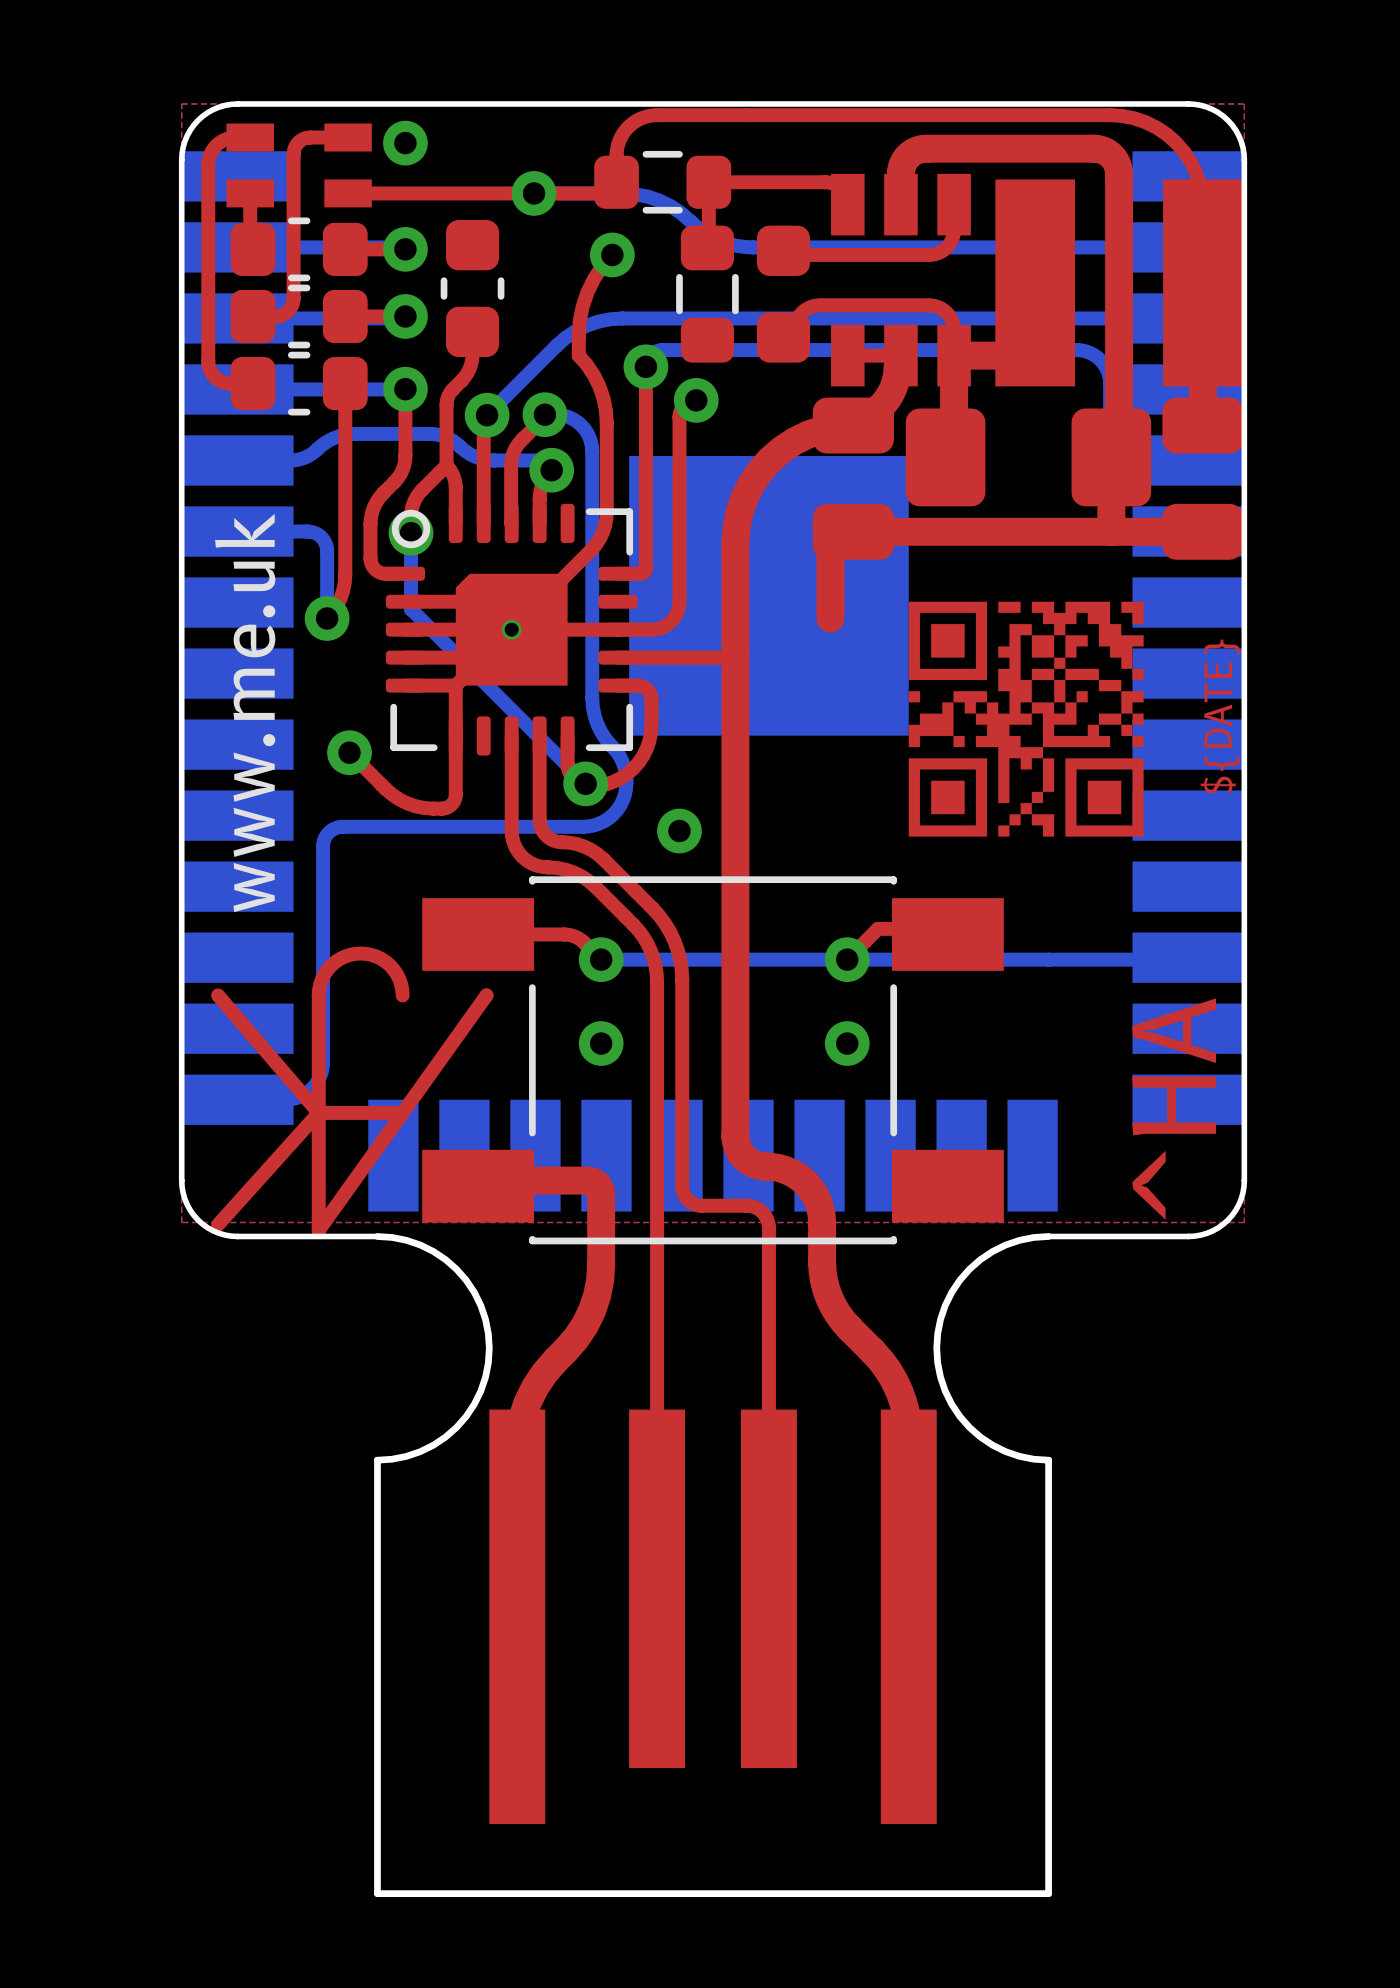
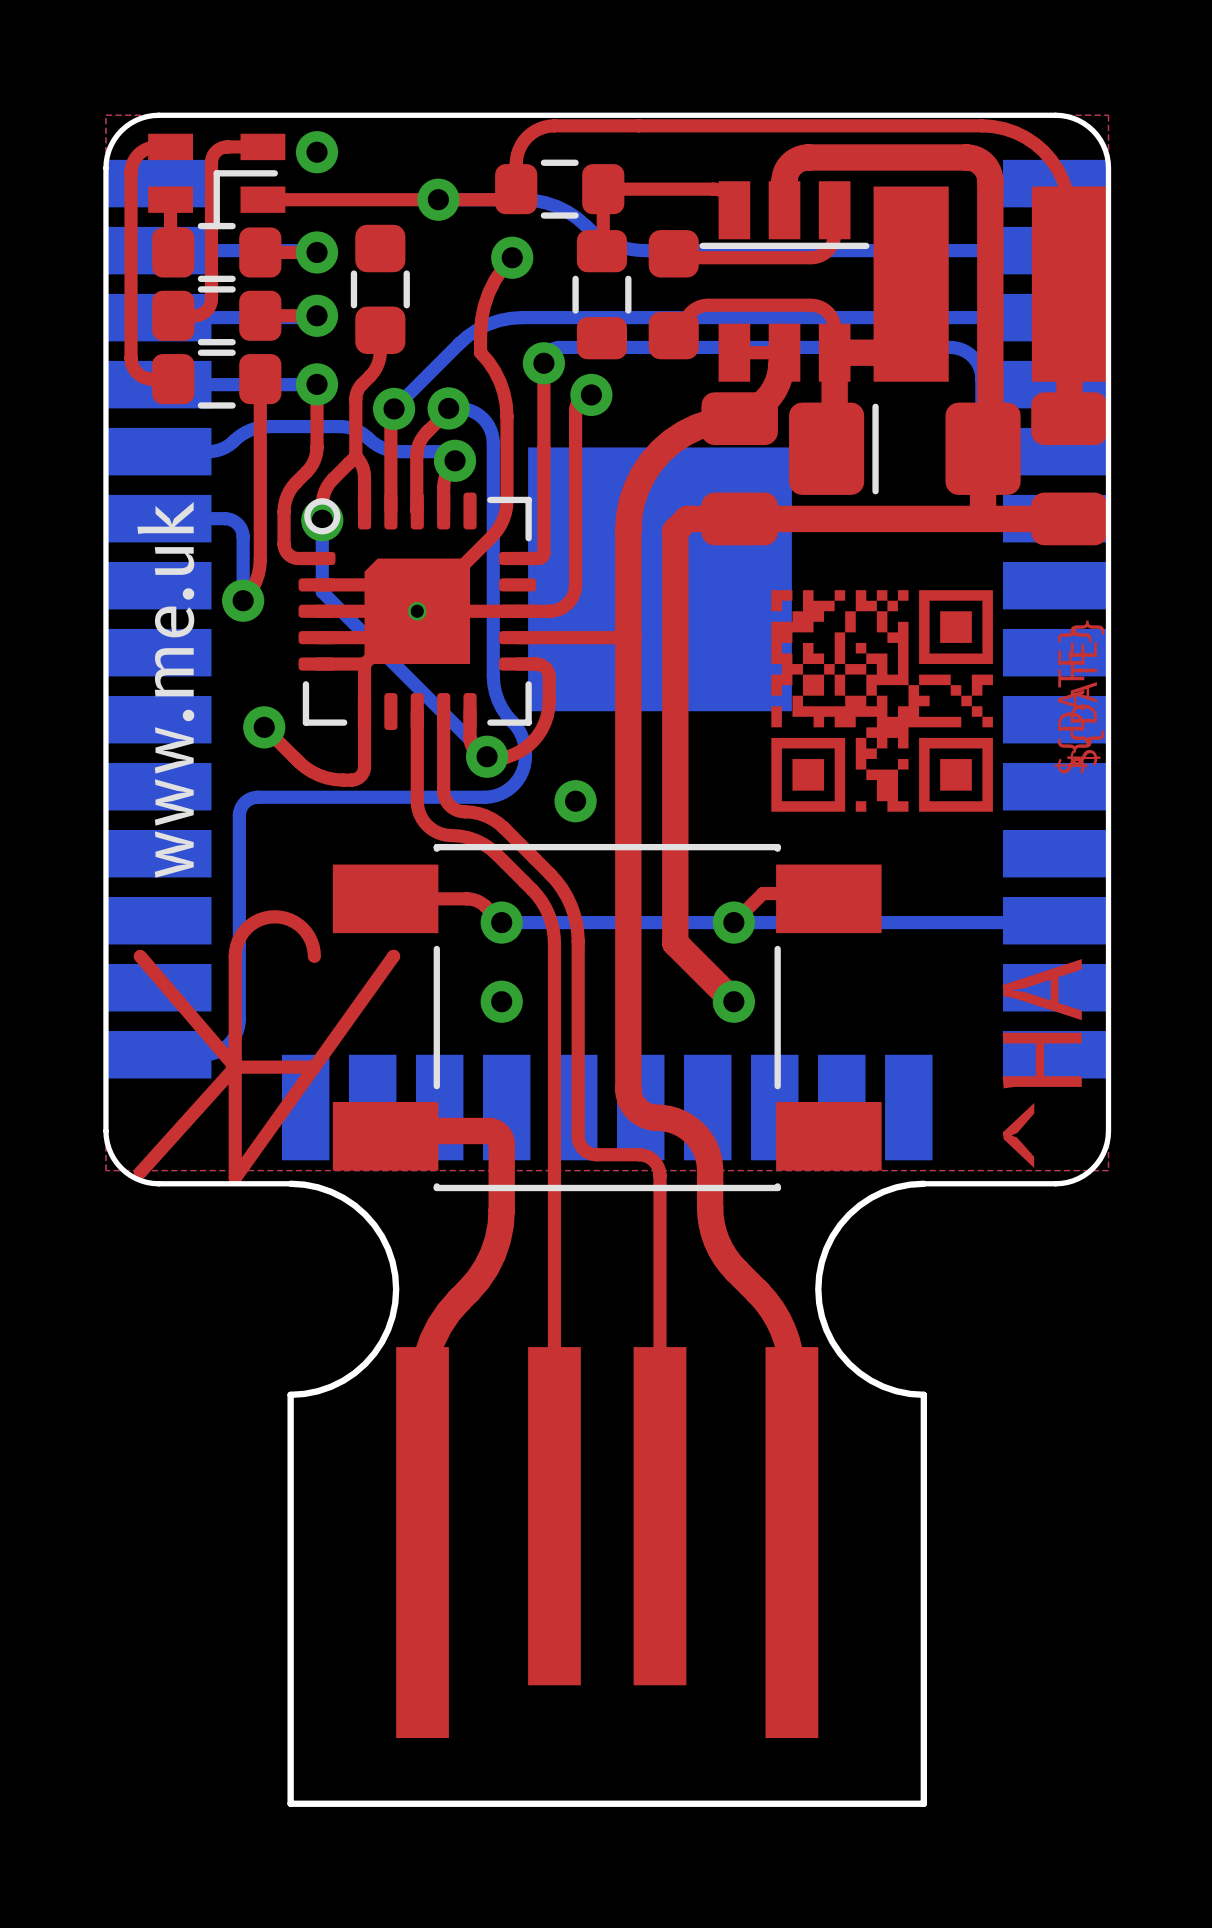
part footprint: [226, 123, 372, 208] -> [148, 133, 286, 230]
part footprint: [756, 134, 1244, 560] -> [648, 144, 1108, 546]
part footprint: [230, 217, 368, 282] -> [152, 222, 282, 283]
part footprint: [440, 220, 505, 358] -> [350, 224, 410, 355]
part footprint: [230, 284, 368, 349] -> [152, 286, 282, 346]
part footprint: [230, 351, 368, 416] -> [152, 349, 282, 409]
top track: (844, 531) (830, 545) (830, 618) -> (731, 518) (687, 518) (675, 531) (675, 943) (733, 1001)
part footprint: [908, 601, 1144, 837] -> [771, 590, 993, 812]

